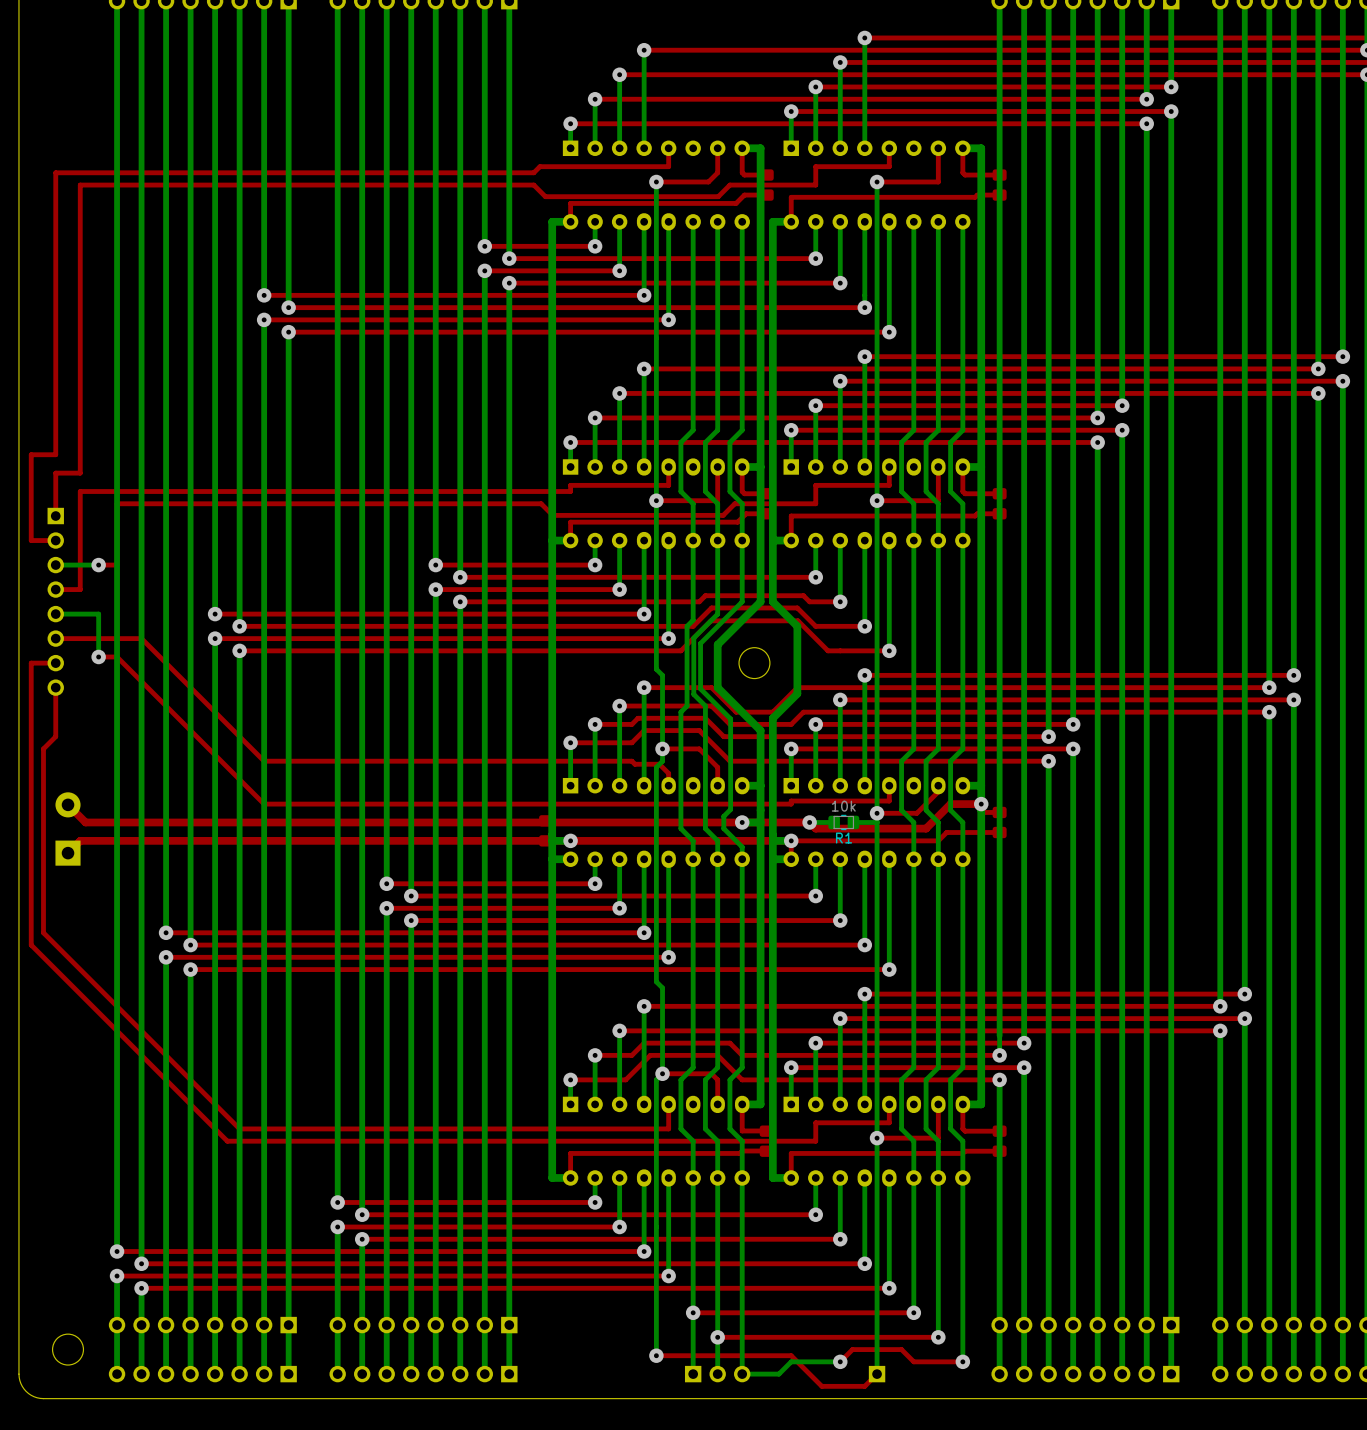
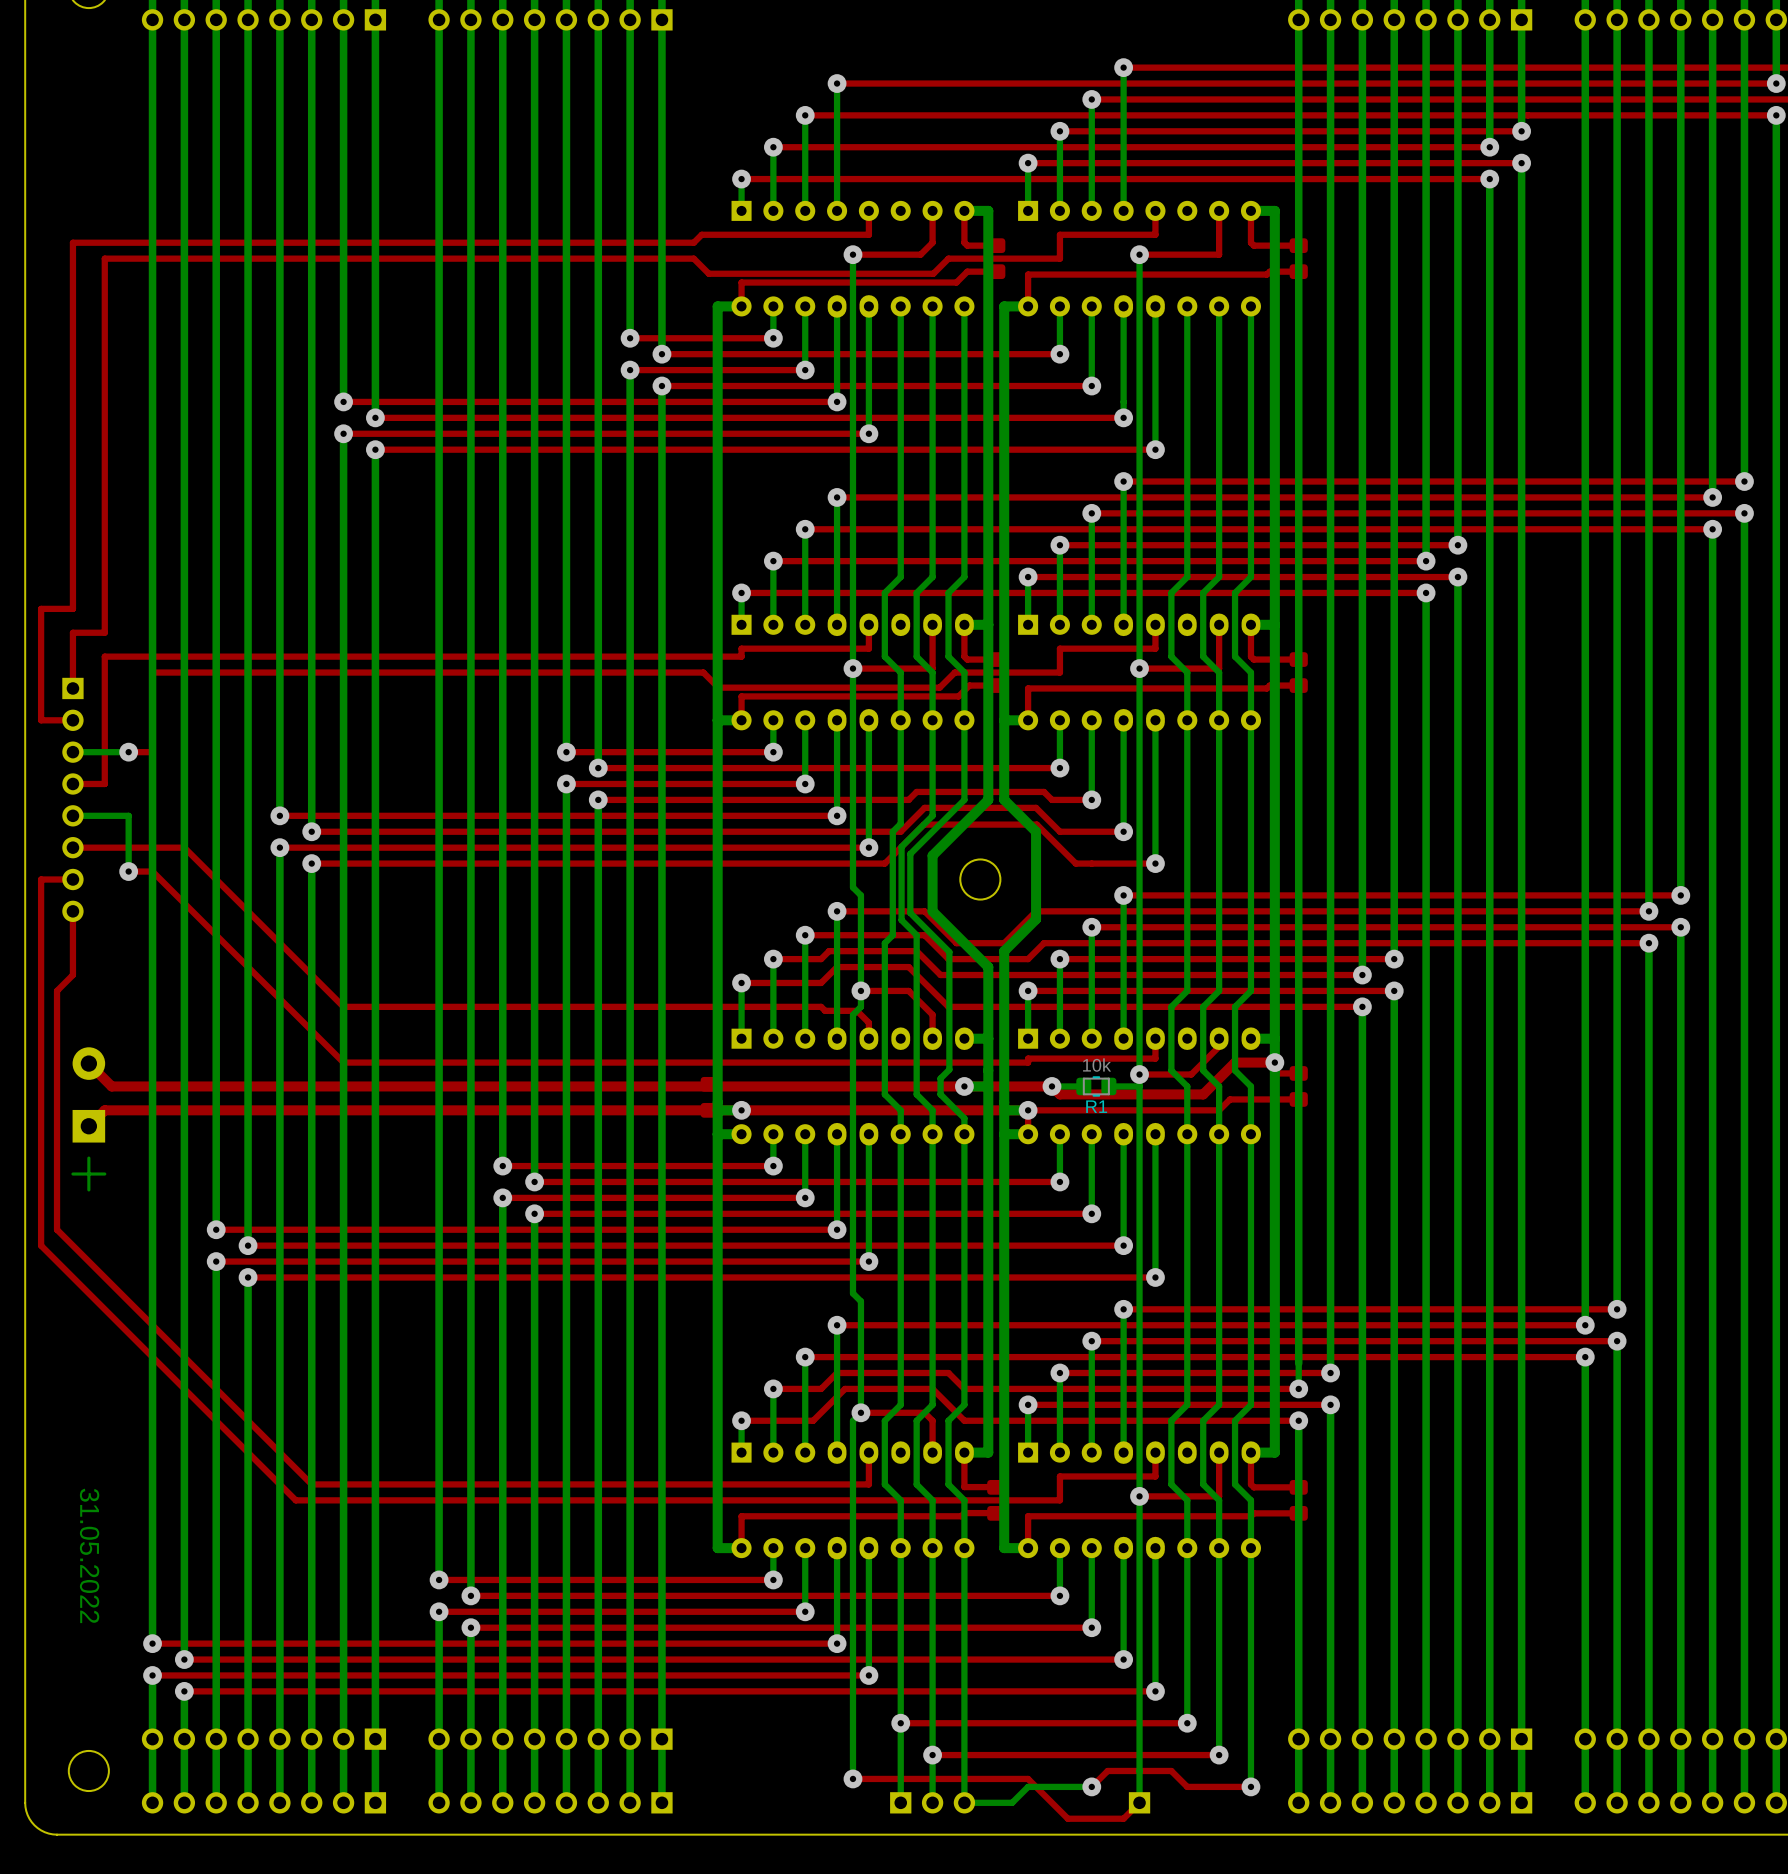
bottom track: none -> (88, 1158) (88, 1189)
bottom track: none -> (104, 1174) (72, 1174)
text: none -> 31.05.2022 (89, 1555)

